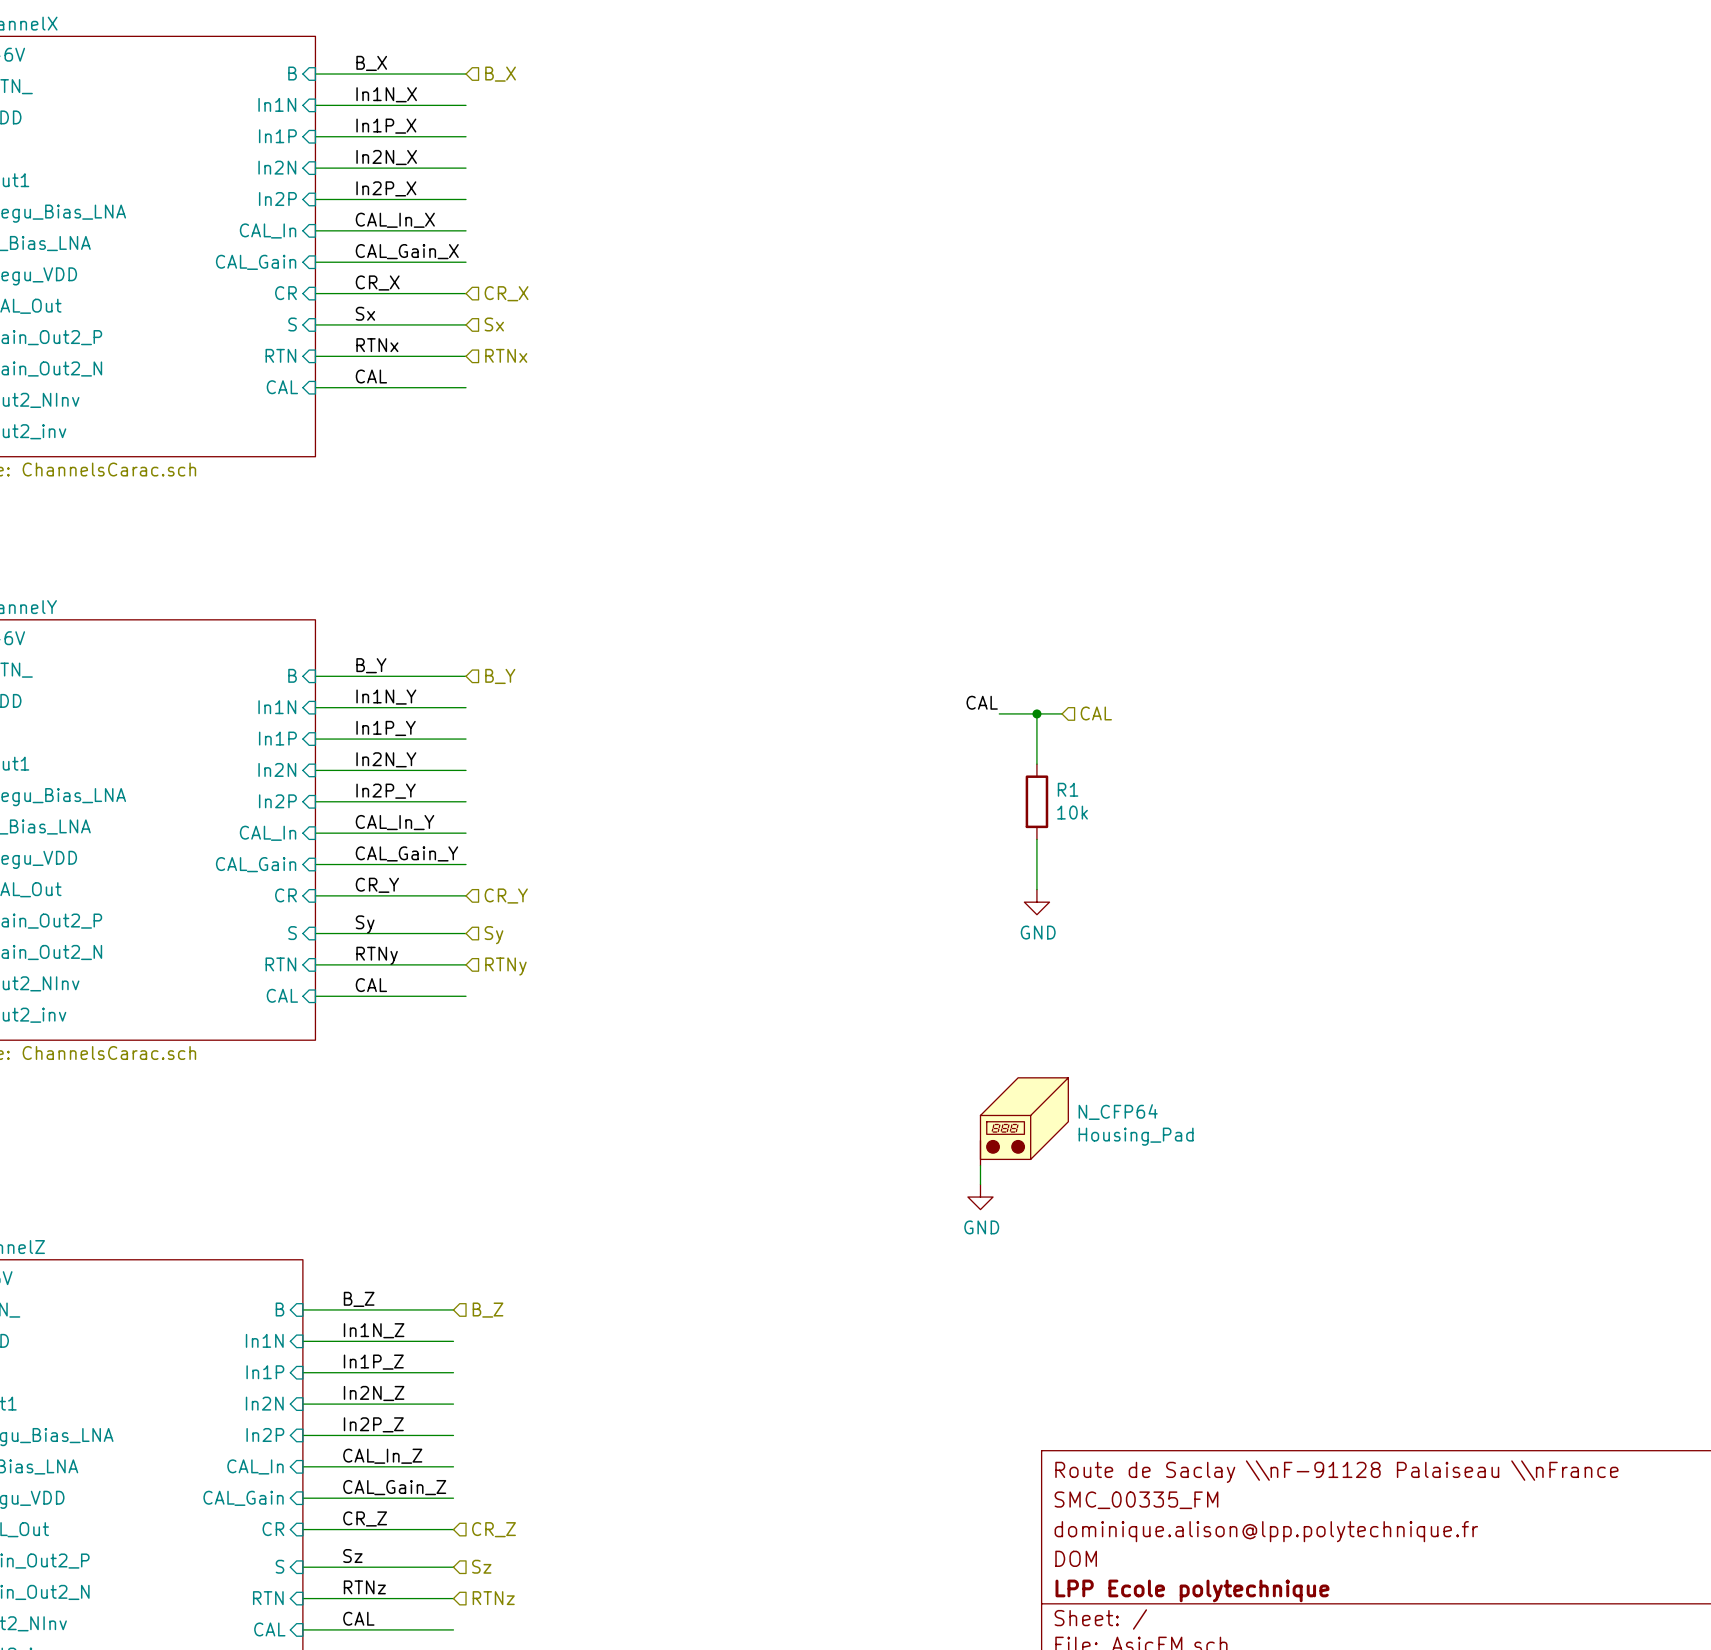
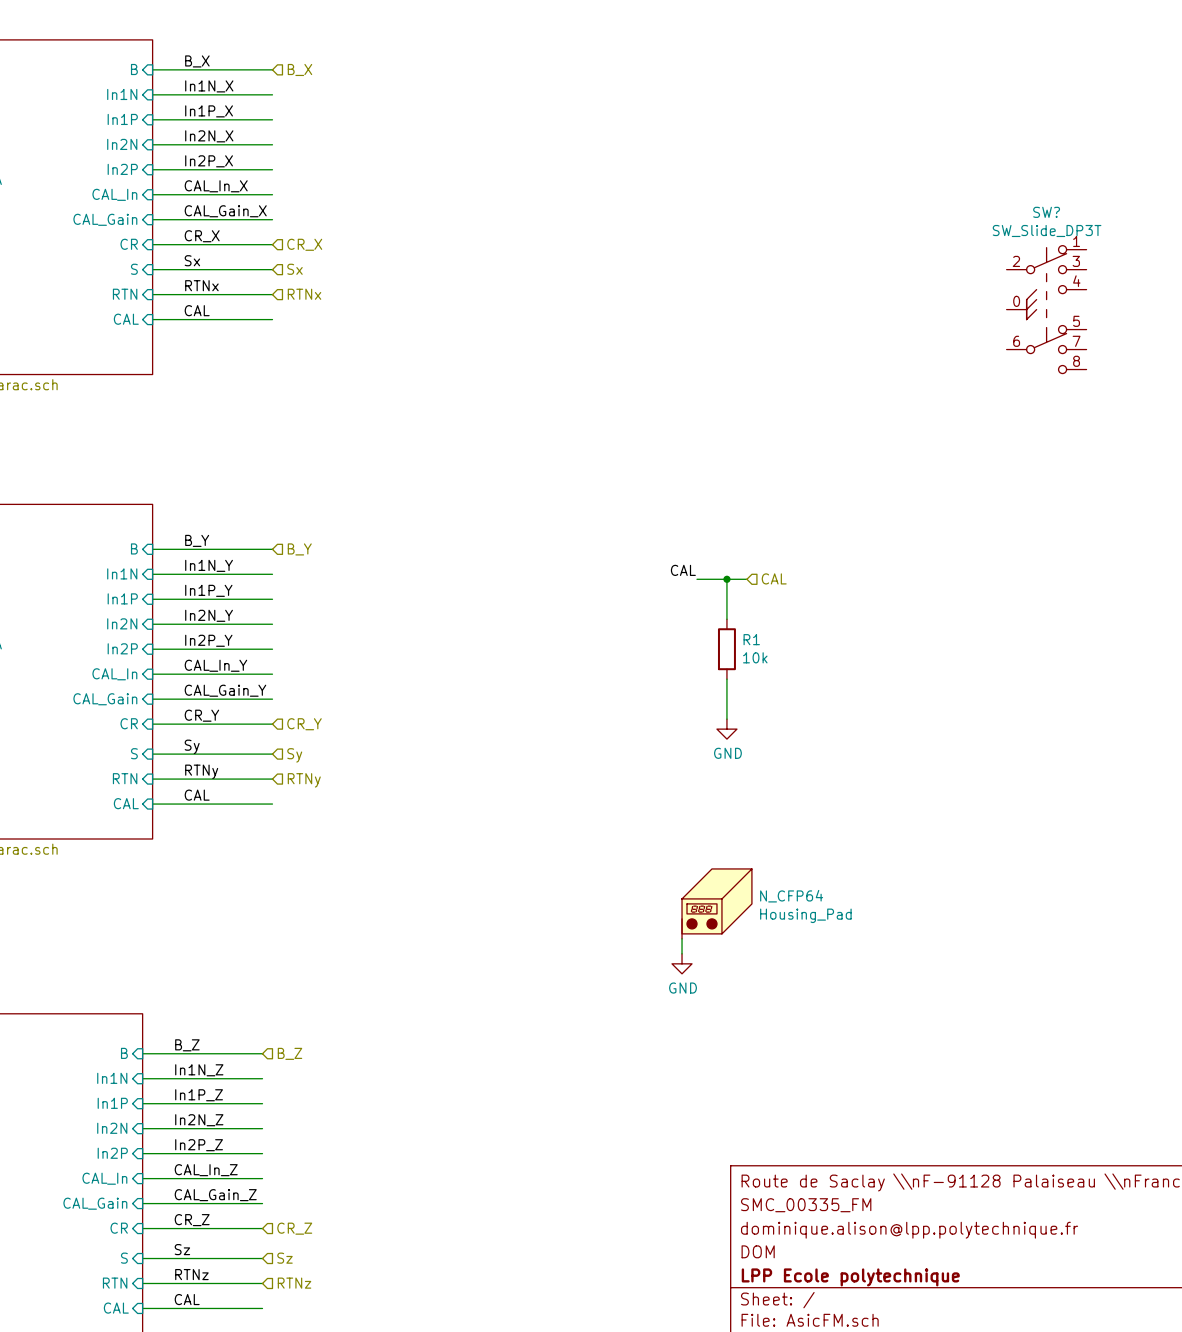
SW?: none -> SW_Slide_DP3T (1046, 309)

